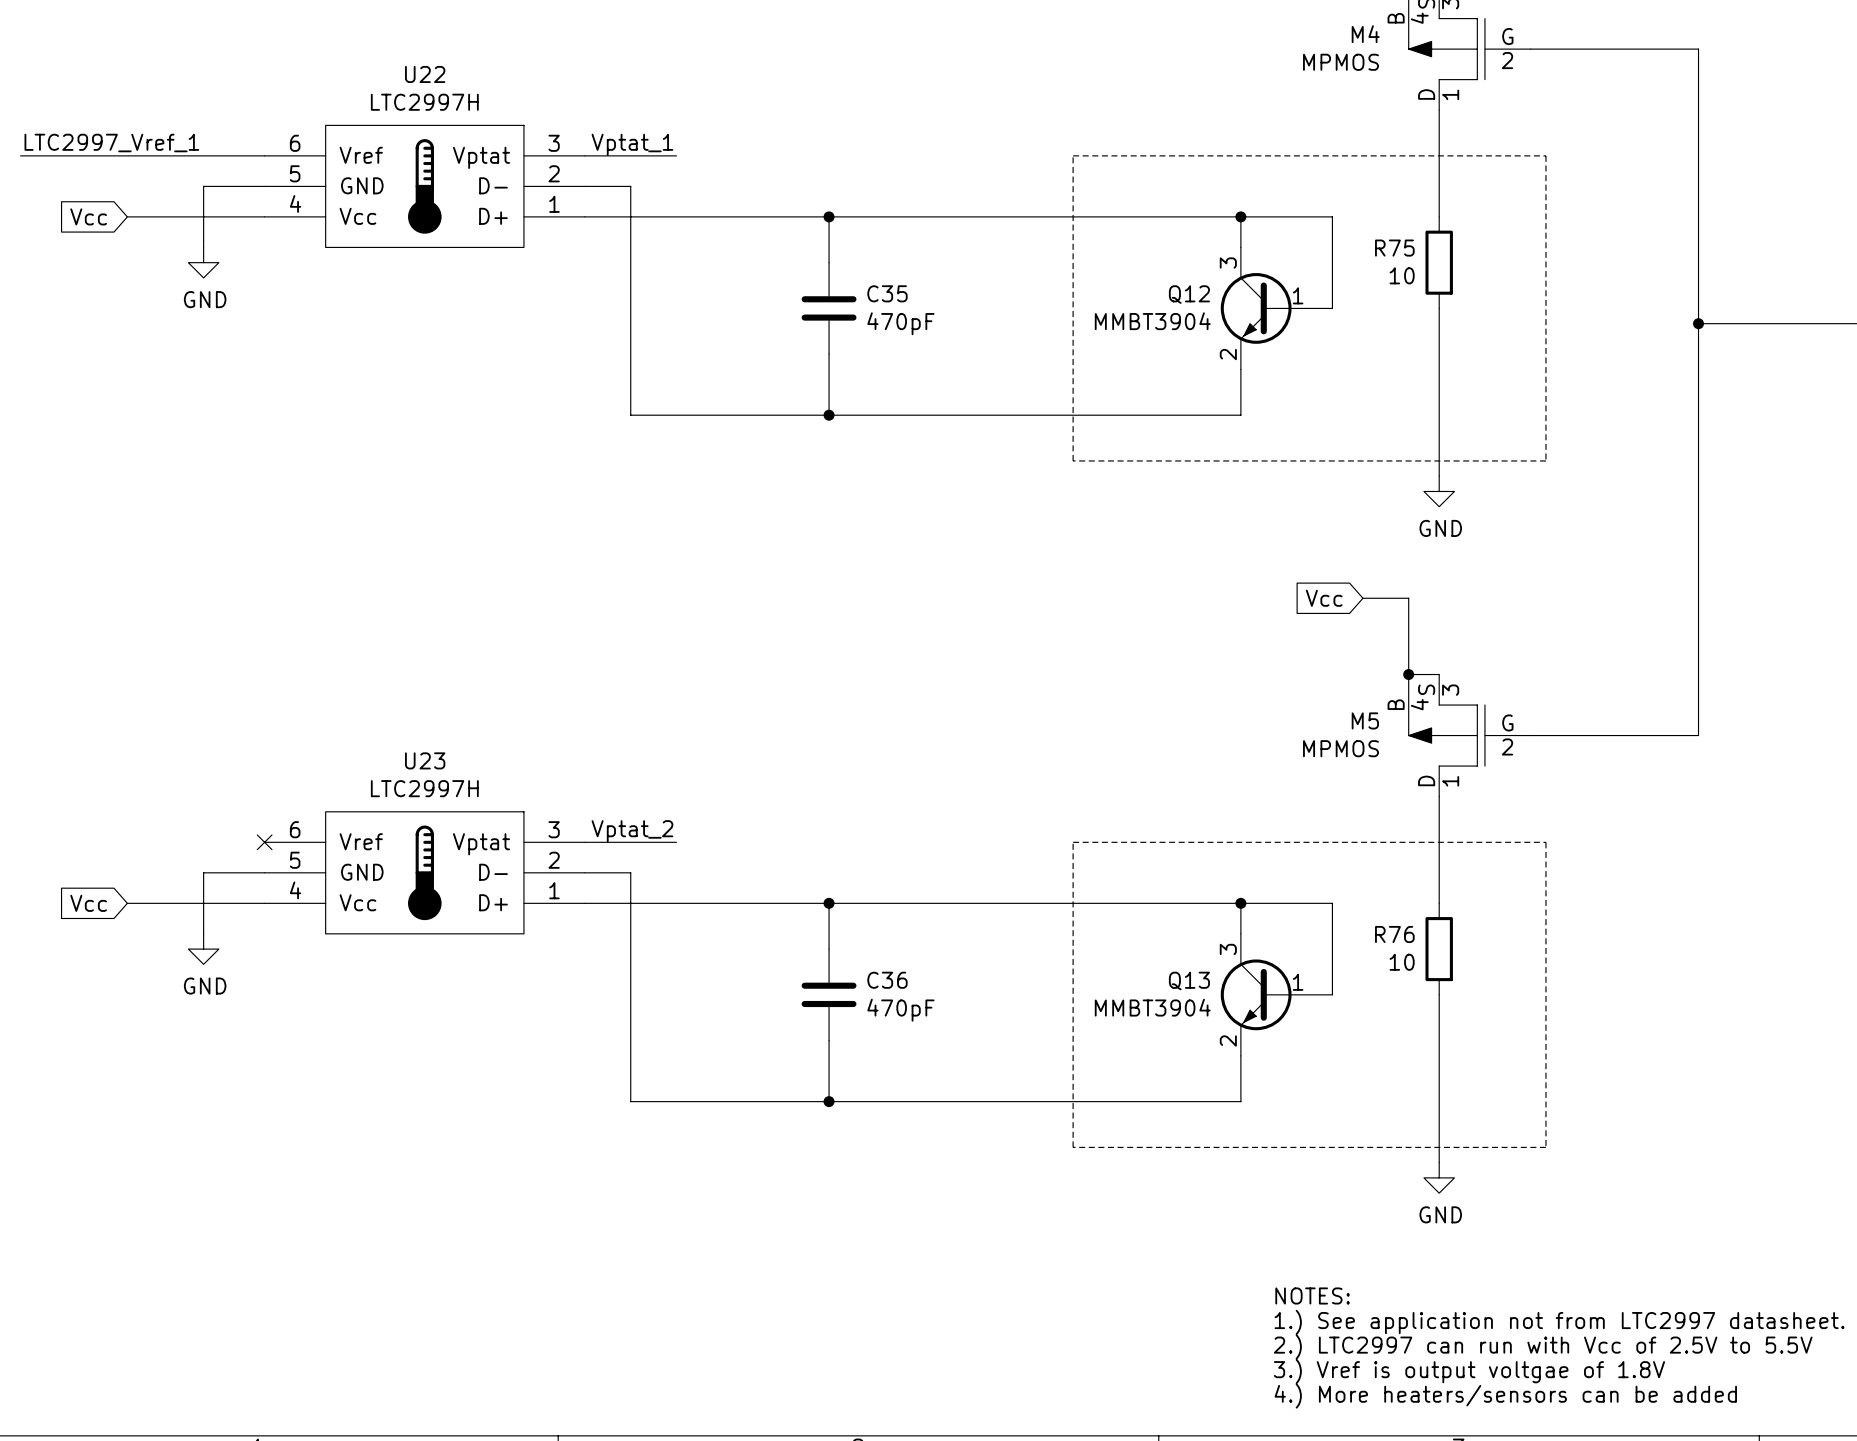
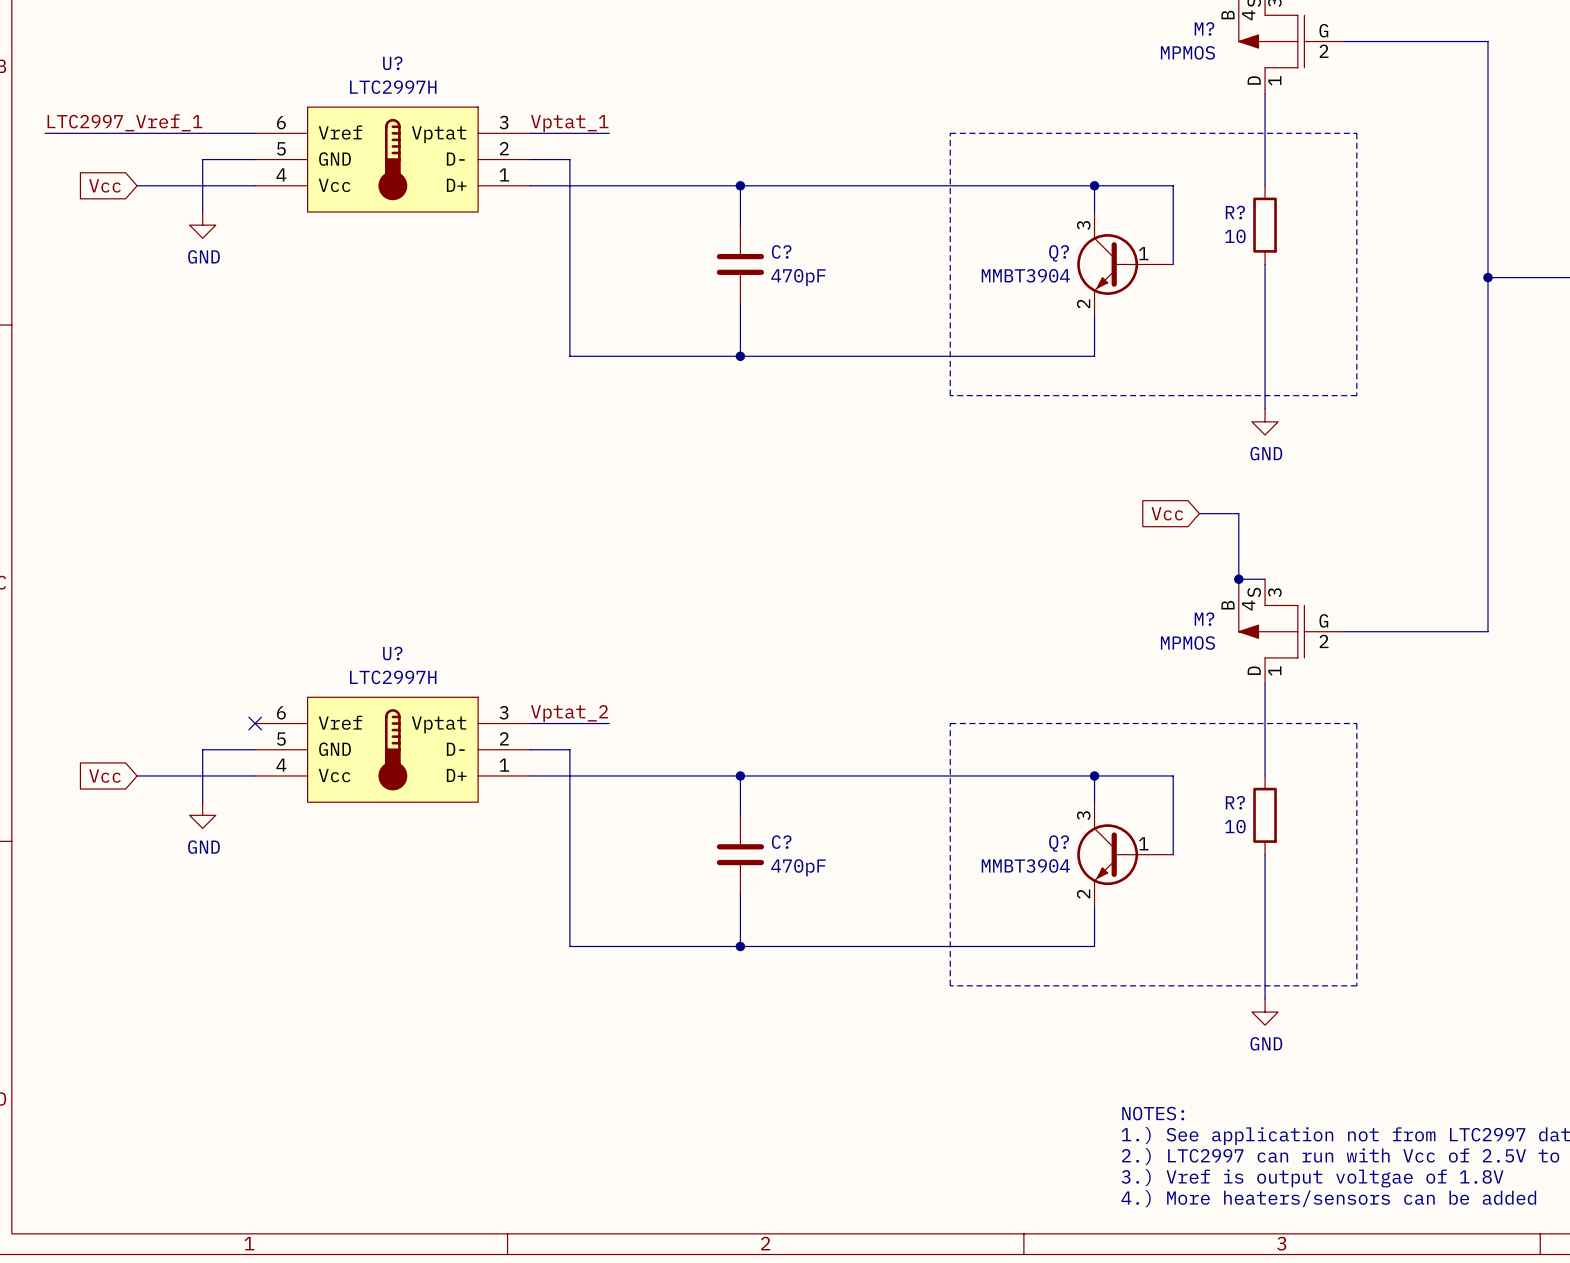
M4 name: M4 (1365, 34) -> M? (1204, 28)
U22 name: U22 (425, 74) -> U? (392, 63)
R75 name: R75 (1394, 248) -> R? (1235, 212)
C35 name: C35 (887, 293) -> C? (781, 251)
Q12 name: Q12 (1189, 294) -> Q? (1059, 253)
M5 name: M5 (1365, 720) -> M? (1204, 619)
U23 name: U23 (425, 760) -> U? (392, 653)
R76 name: R76 (1394, 934) -> R? (1235, 802)
C36 name: C36 (887, 980) -> C? (781, 842)
Q13 name: Q13 (1189, 980) -> Q? (1059, 843)

